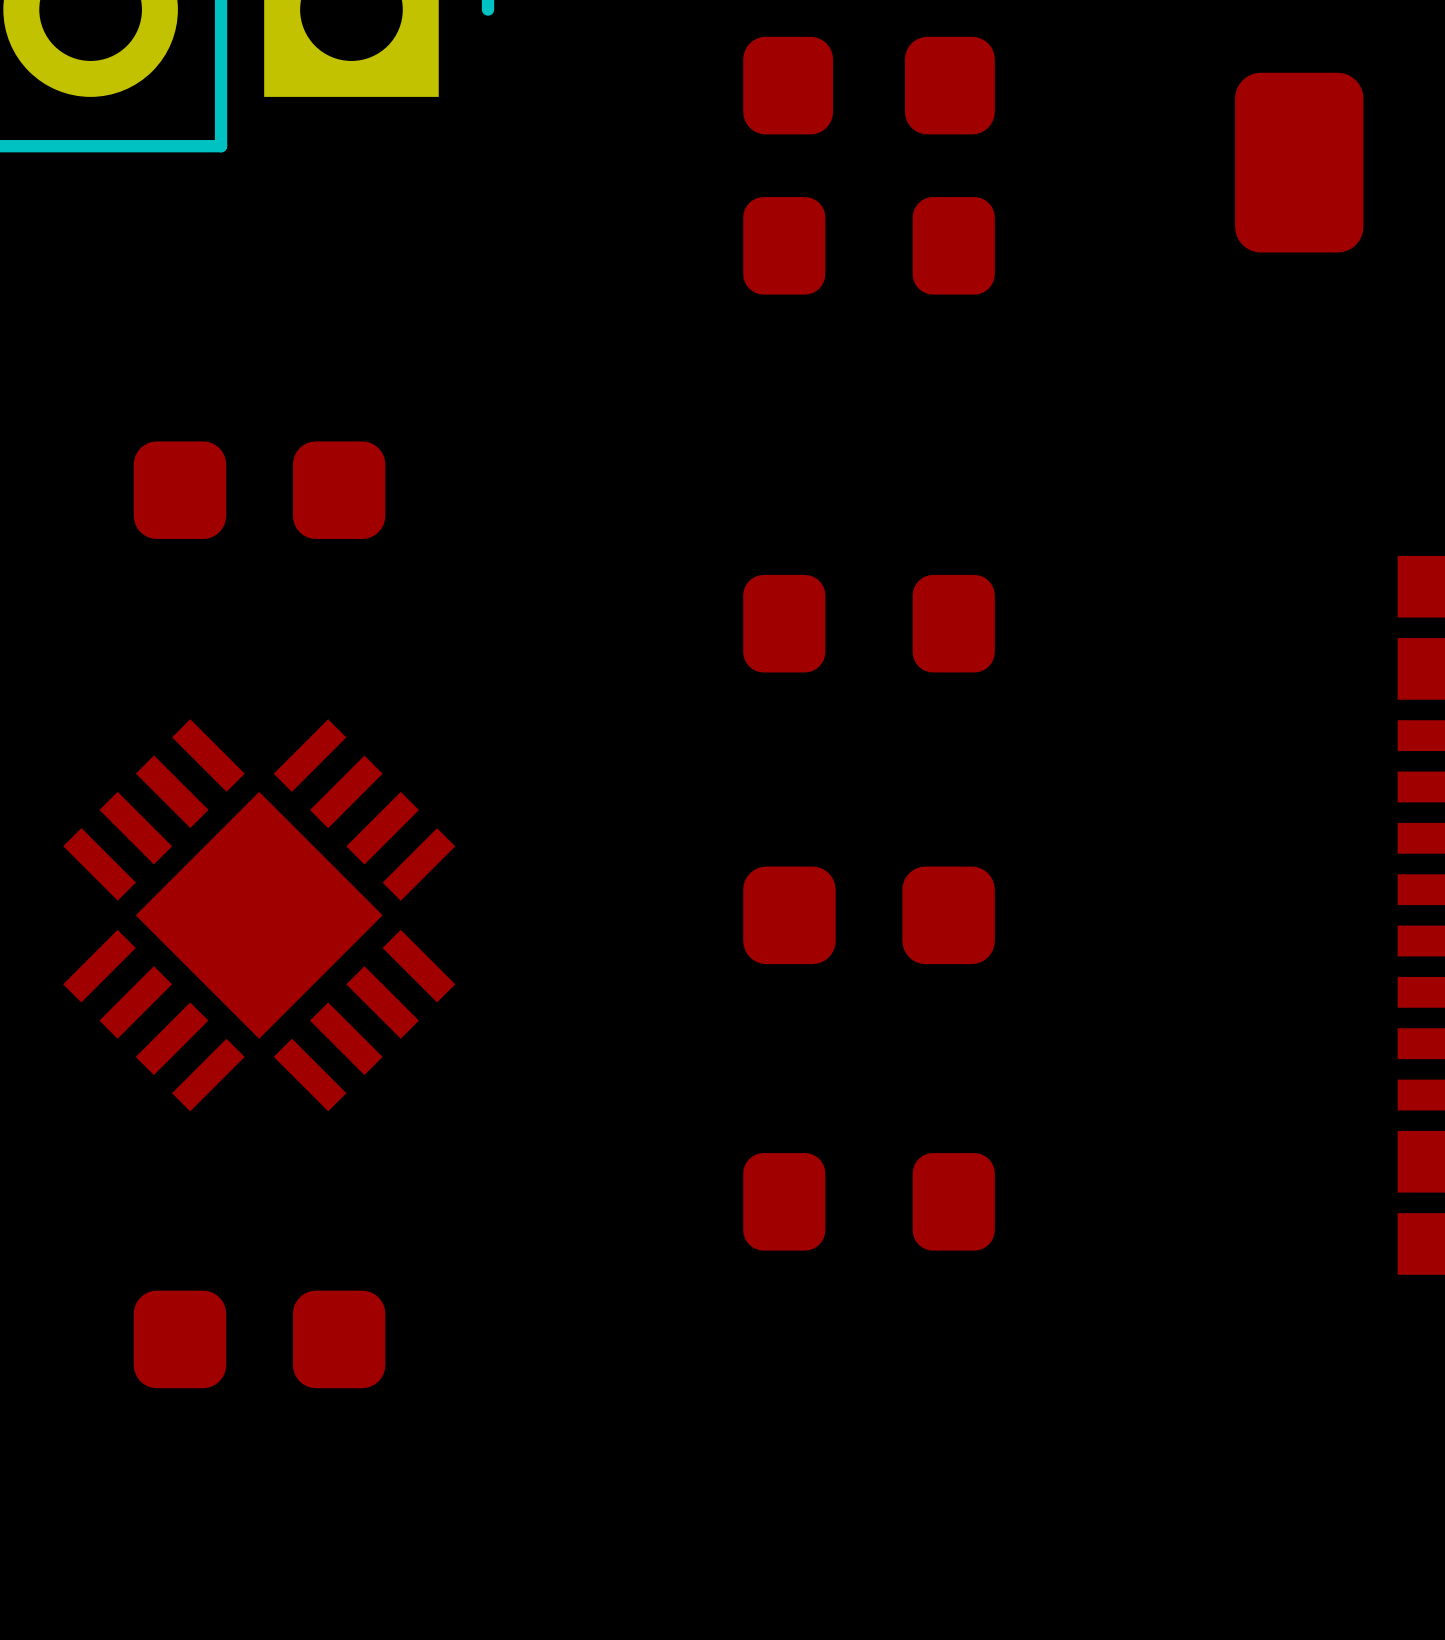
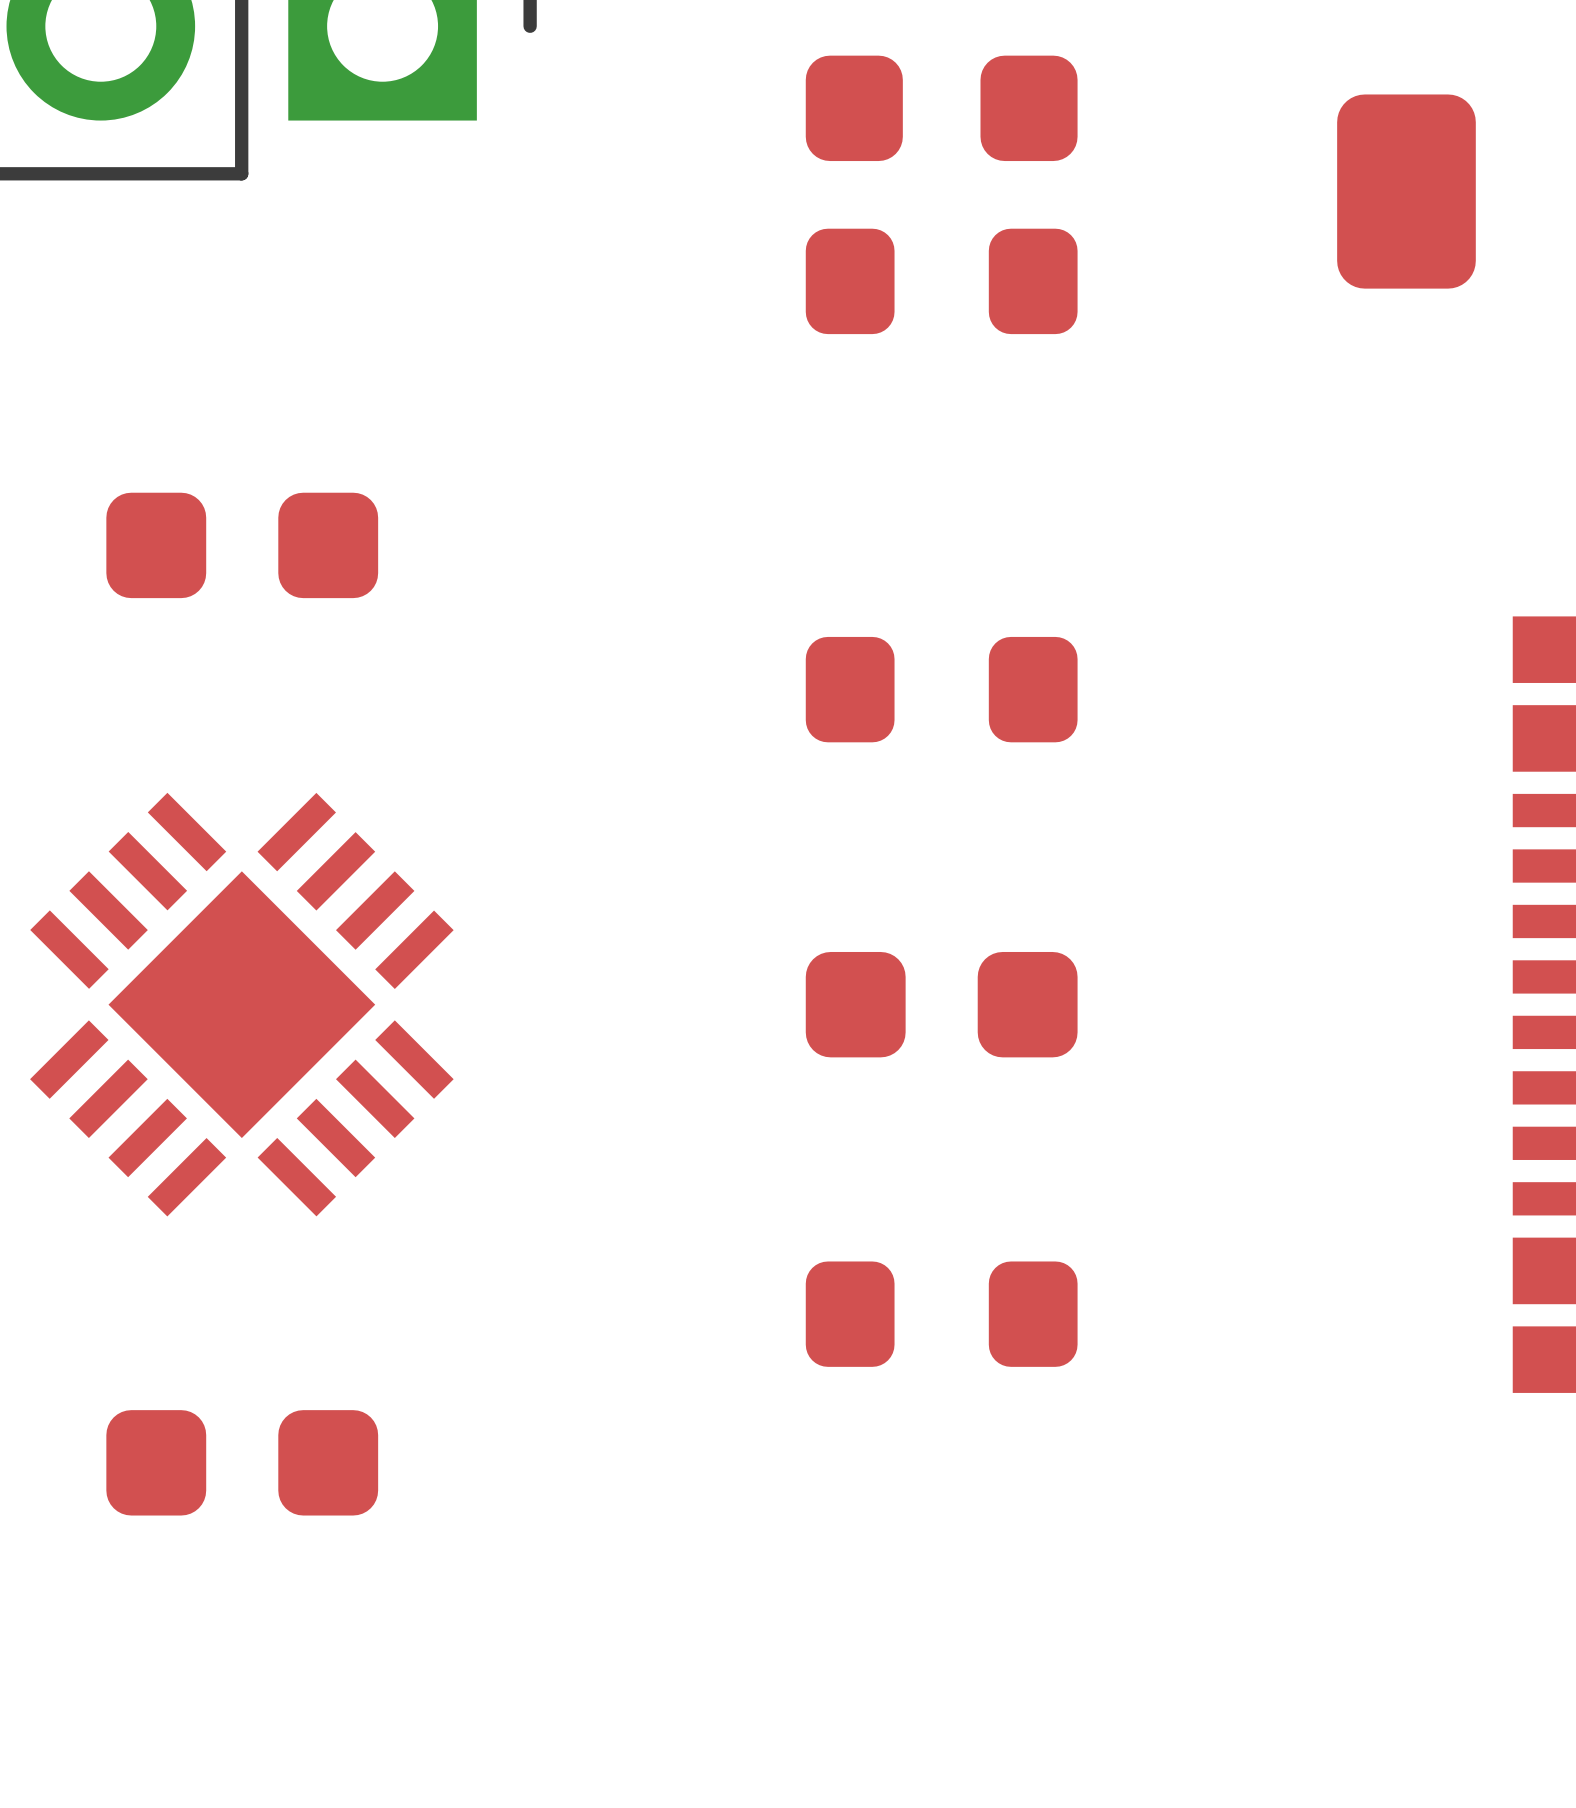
part position: (259, 490) -> (242, 545)
part position: (259, 915) -> (241, 1004)
part position: (259, 1339) -> (242, 1462)

